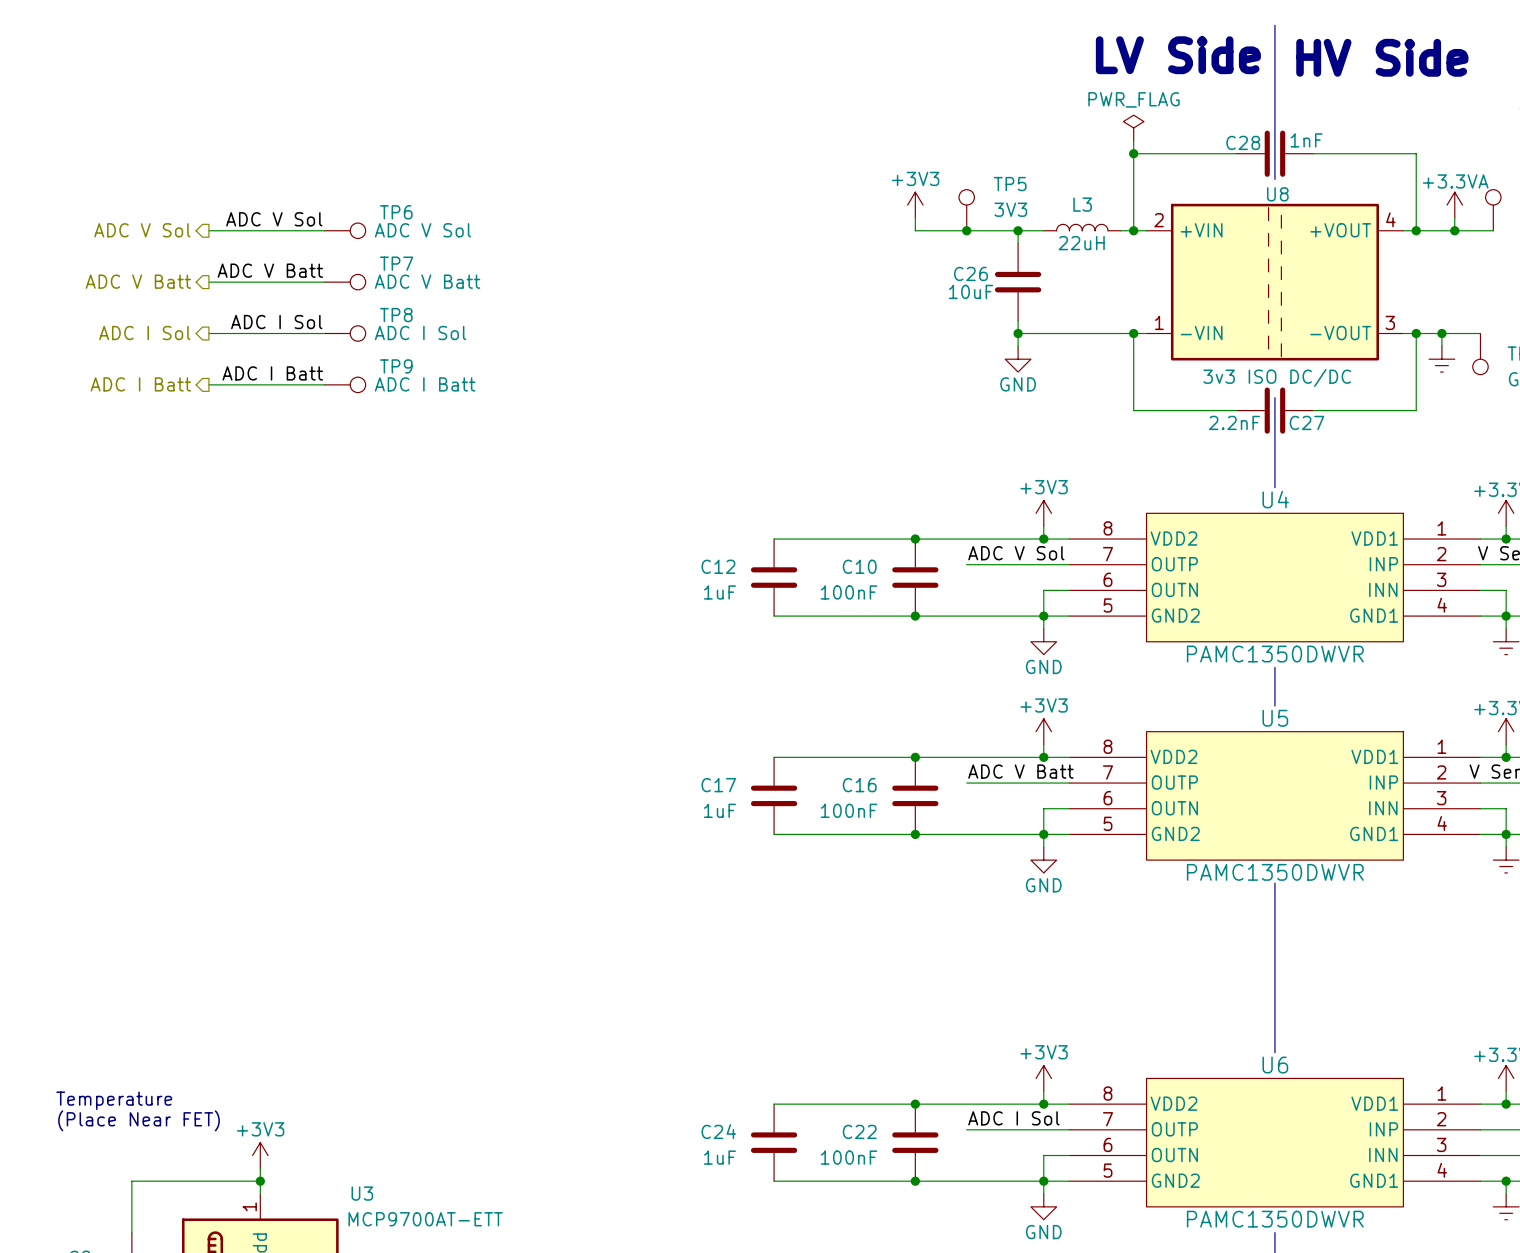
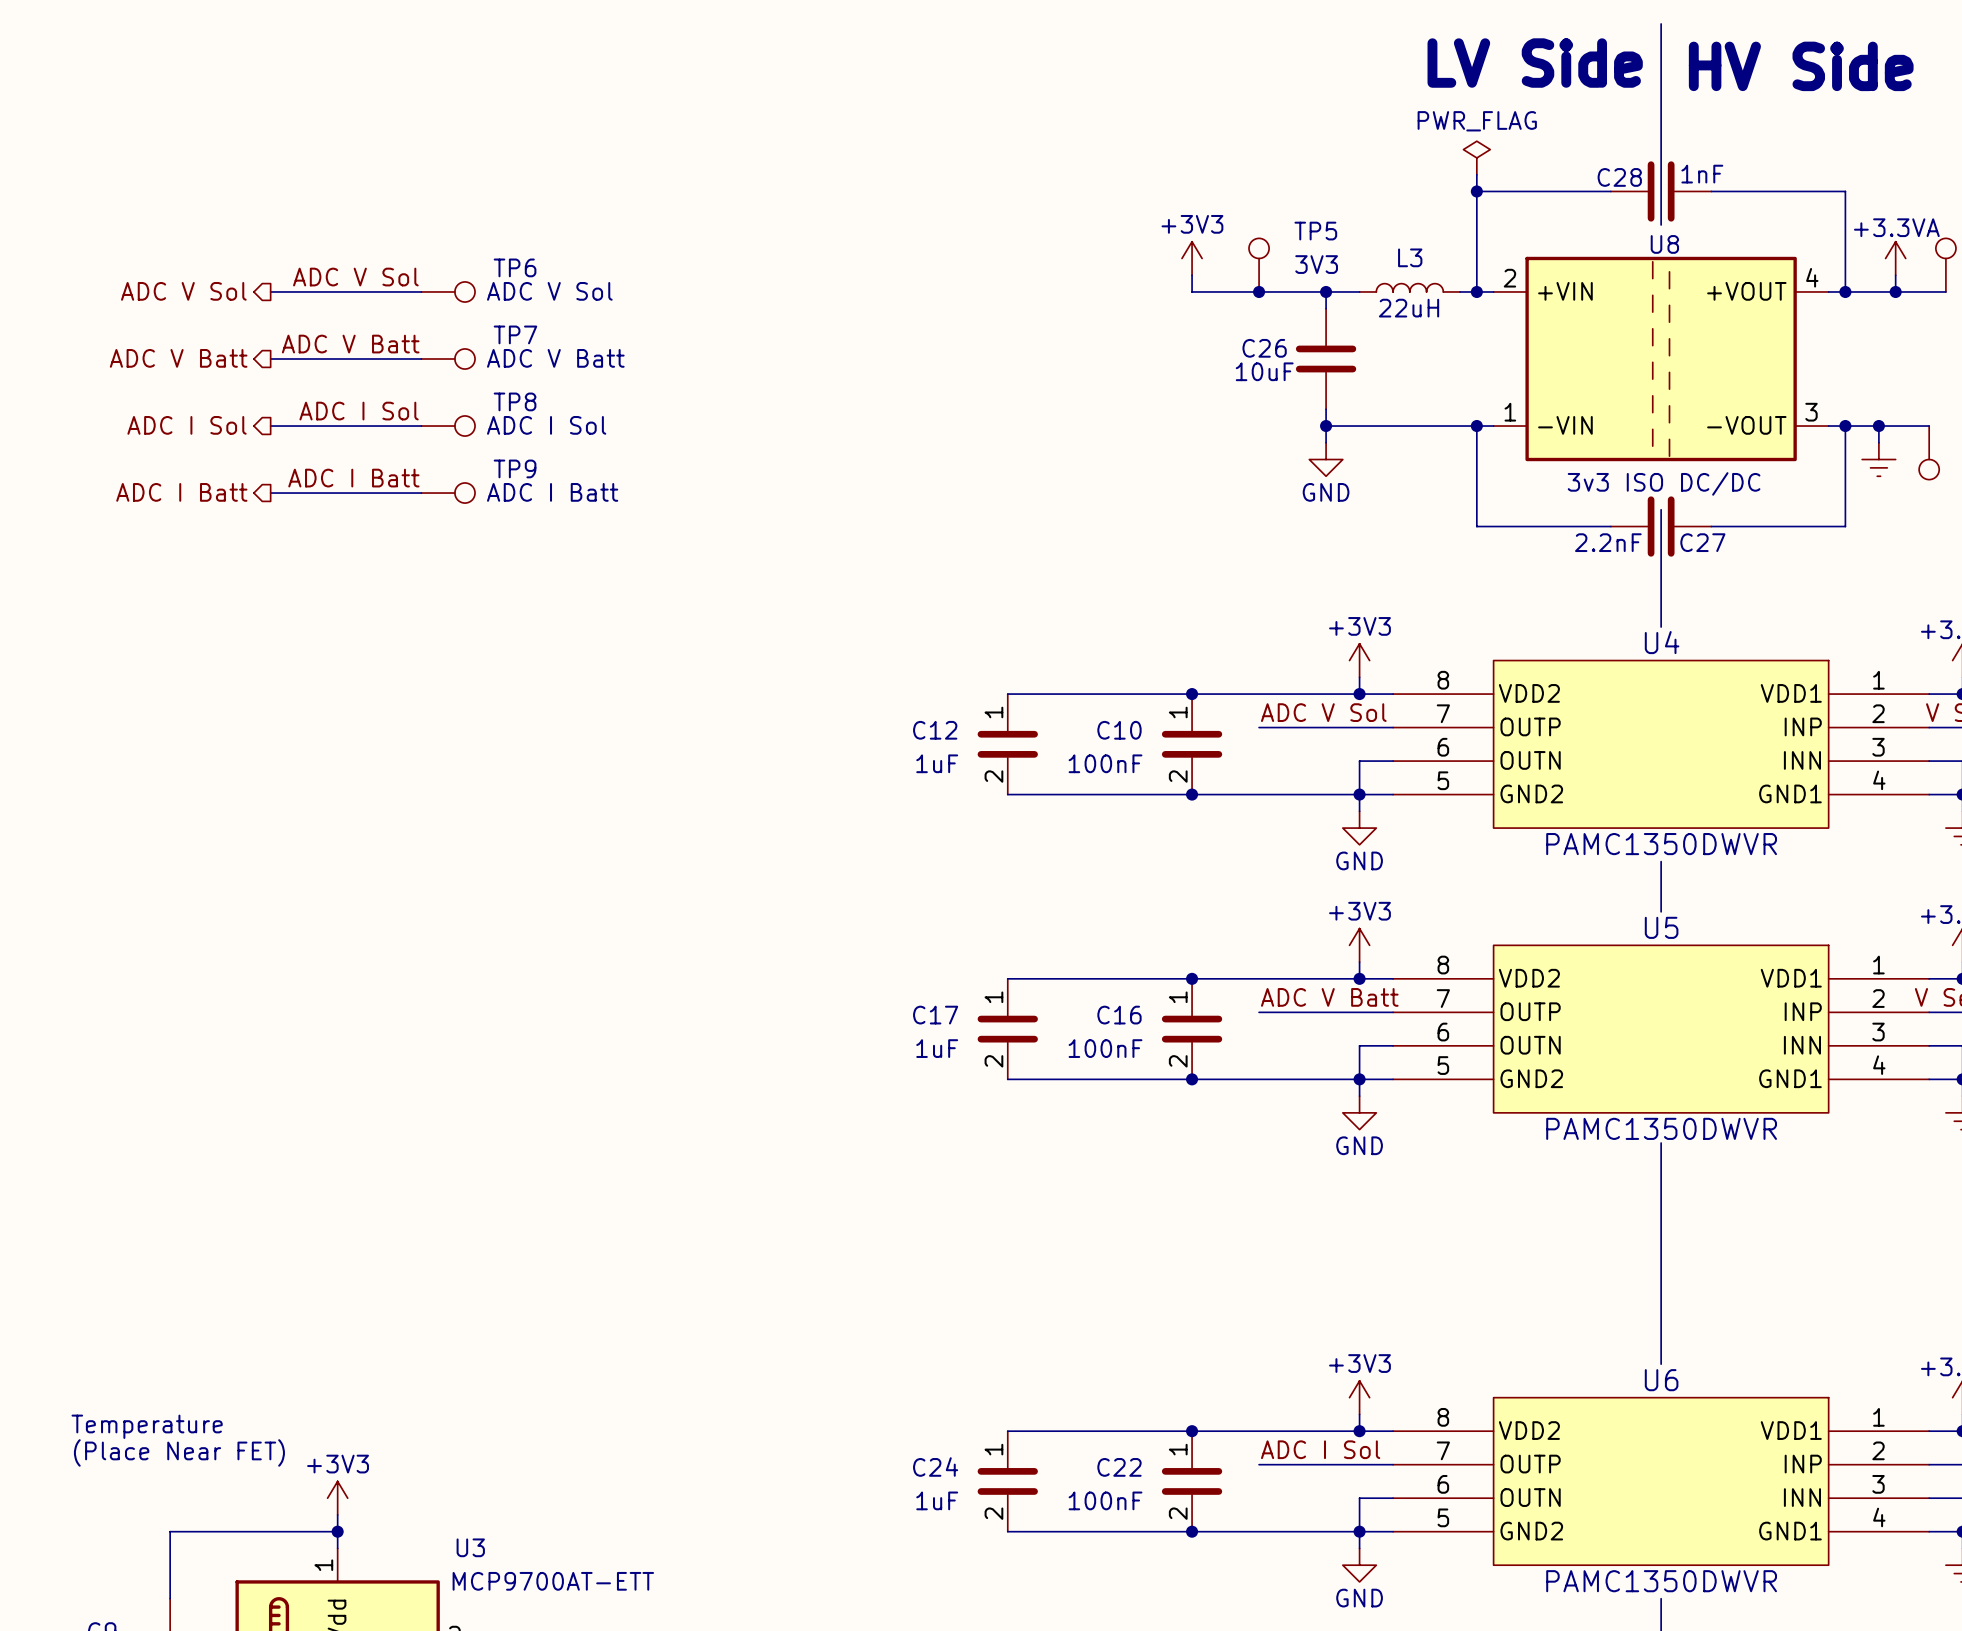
C12 pin number: none -> 1 (993, 712)
C10 pin number: none -> 1 (1178, 712)
C12 pin number: none -> 2 (993, 776)
C10 pin number: none -> 2 (1178, 776)
C17 pin number: none -> 1 (993, 997)
C16 pin number: none -> 1 (1178, 997)
C17 pin number: none -> 2 (993, 1061)
C16 pin number: none -> 2 (1178, 1061)
C24 pin number: none -> 1 (993, 1449)
C22 pin number: none -> 1 (1178, 1449)
C24 pin number: none -> 2 (993, 1513)
C22 pin number: none -> 2 (1178, 1513)

